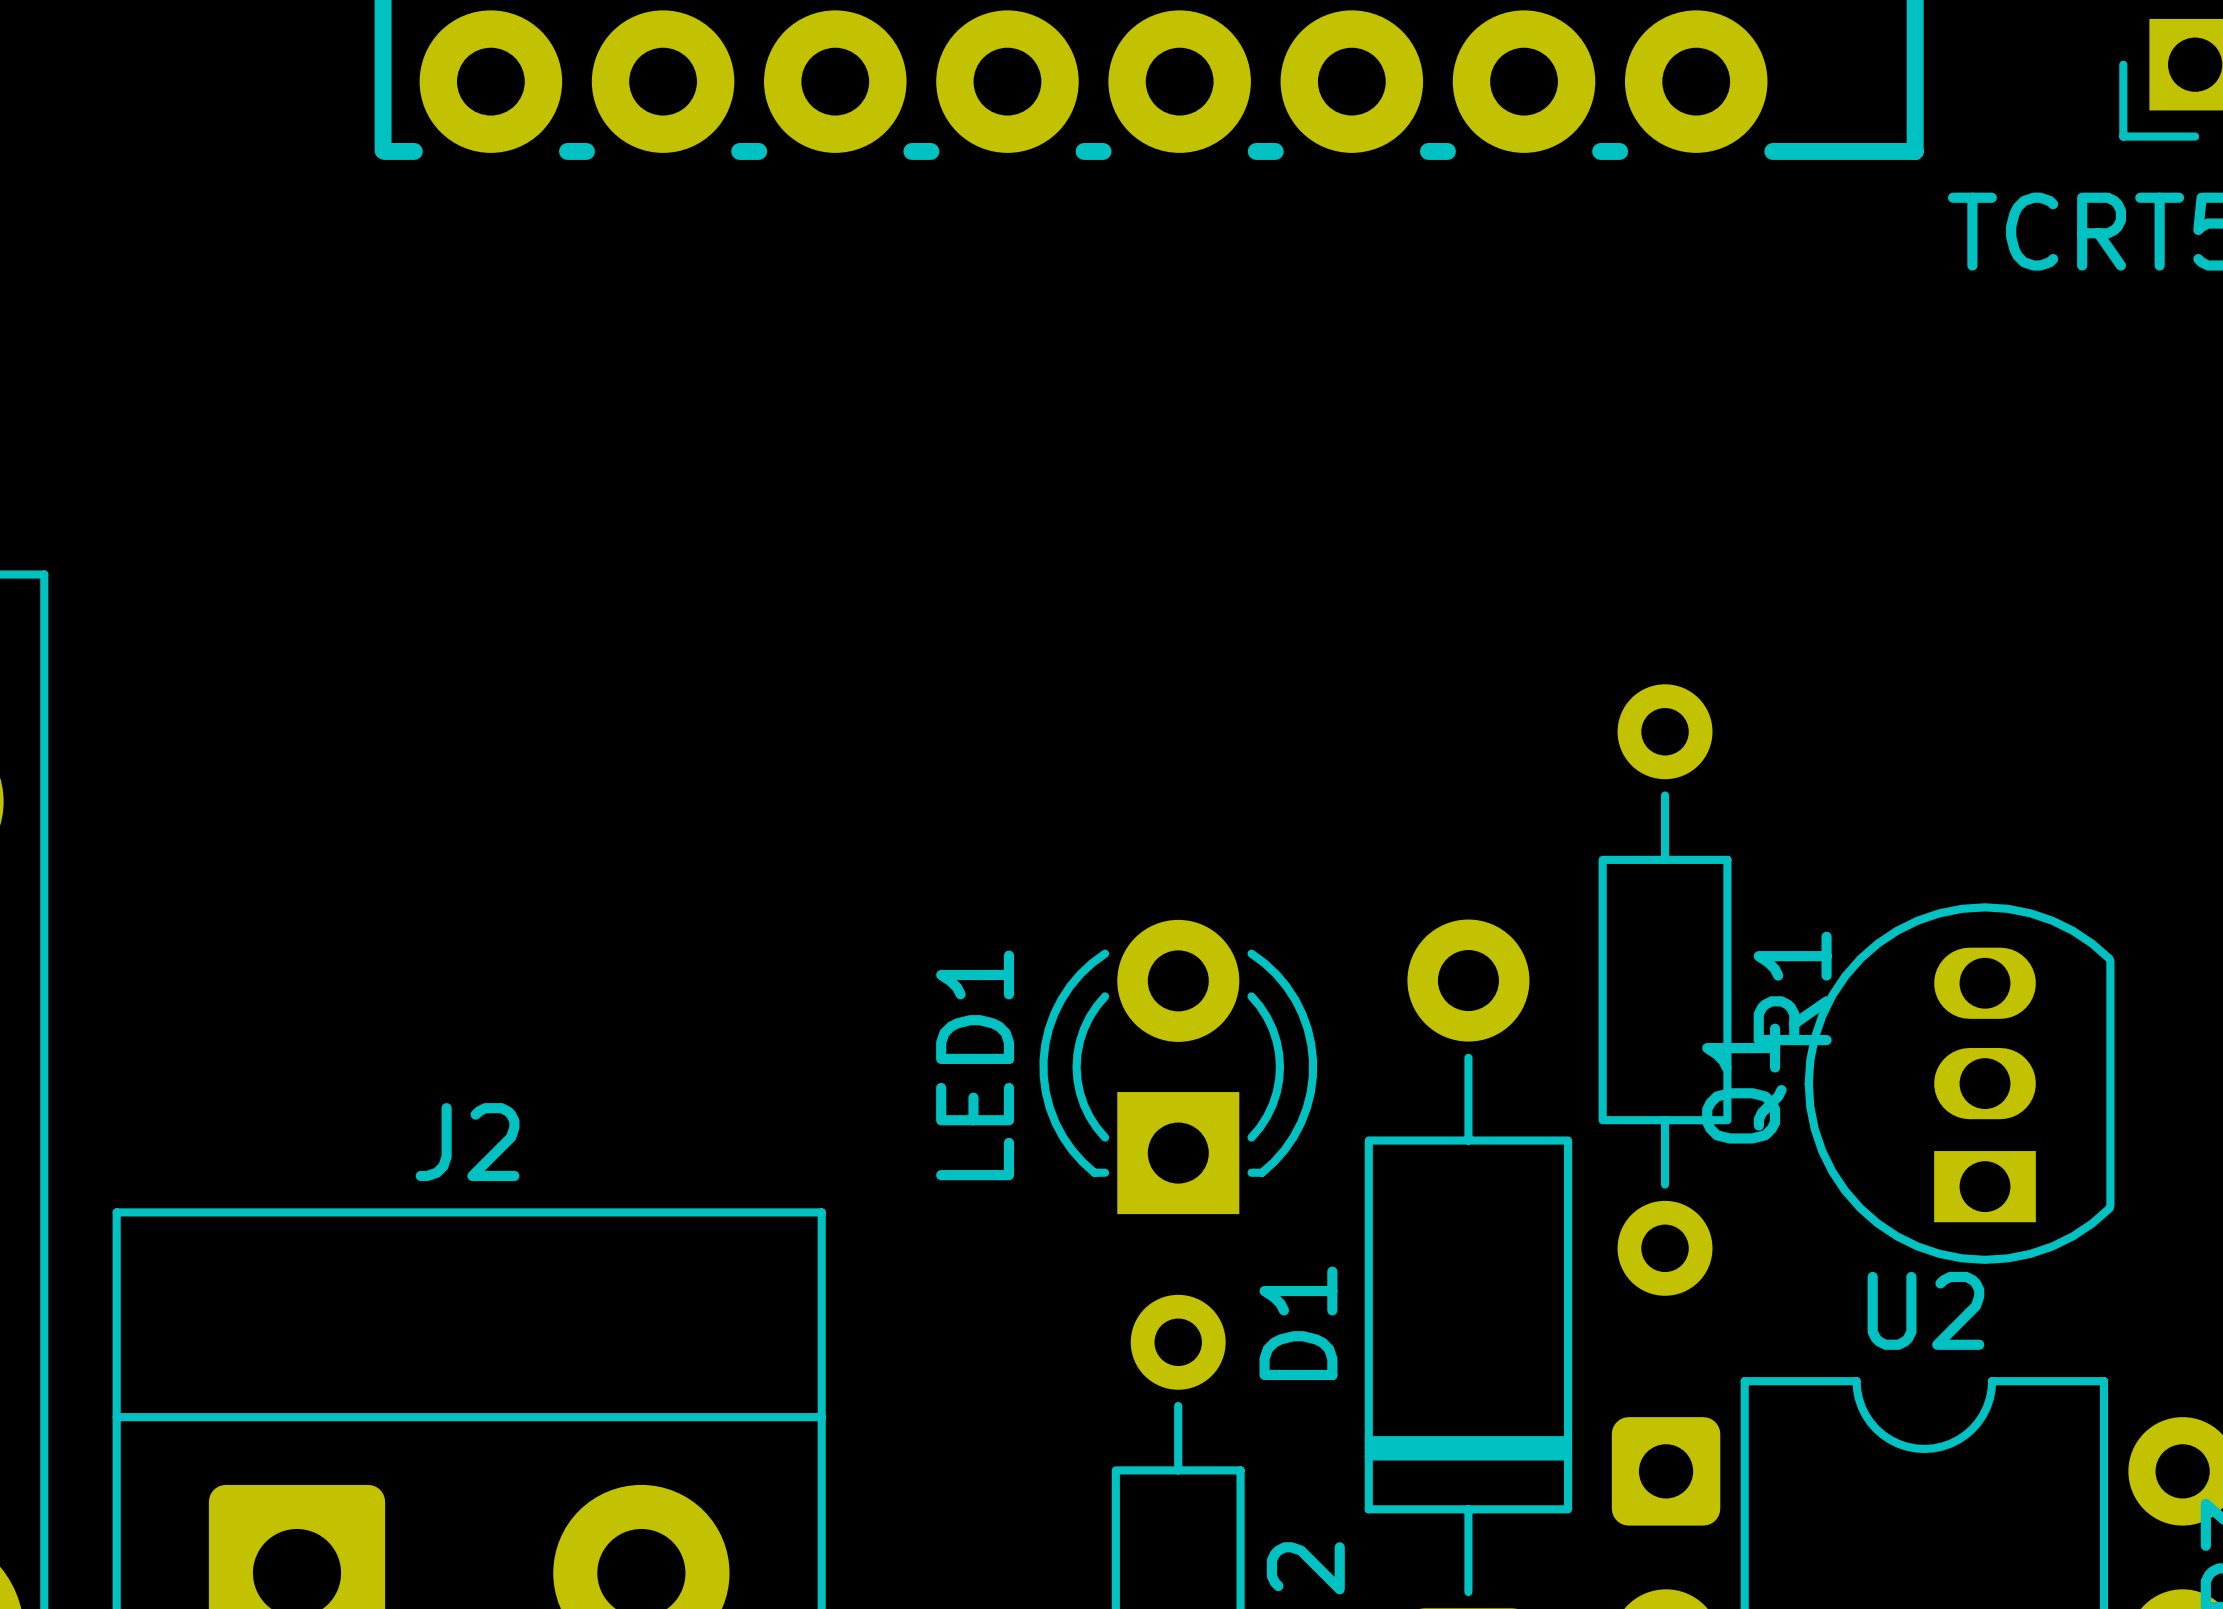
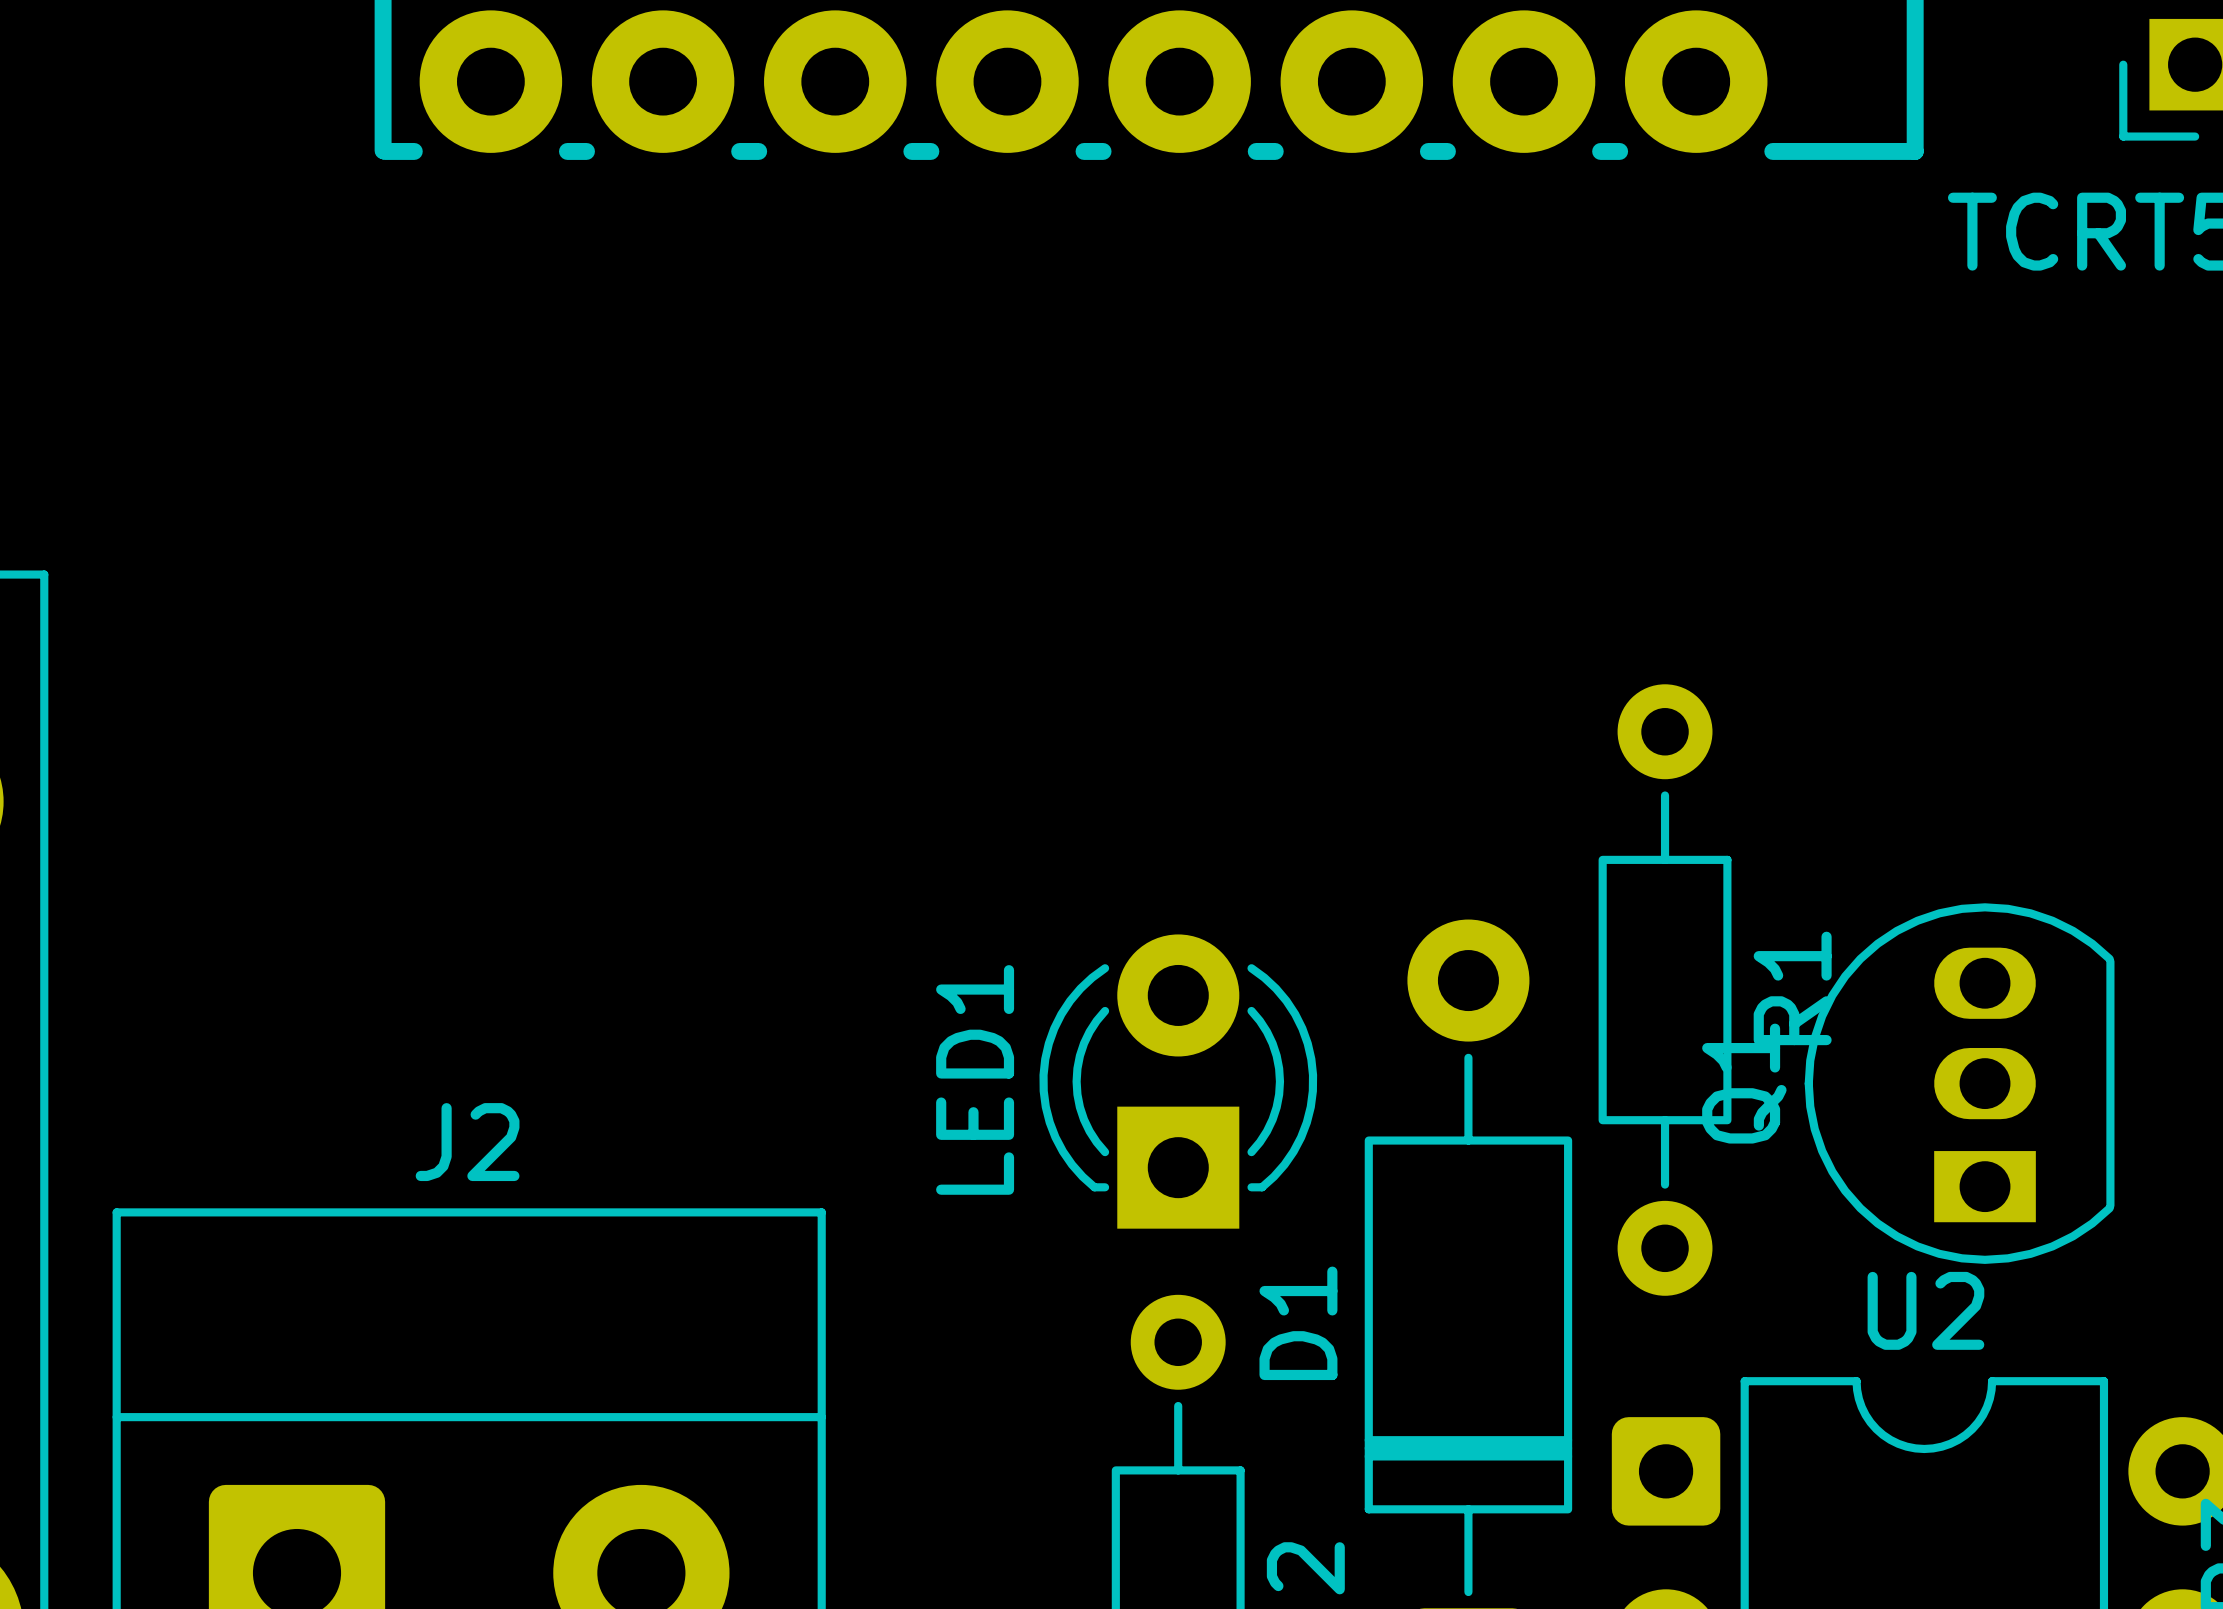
LED1 position: (1178, 1066) -> (1178, 1081)

